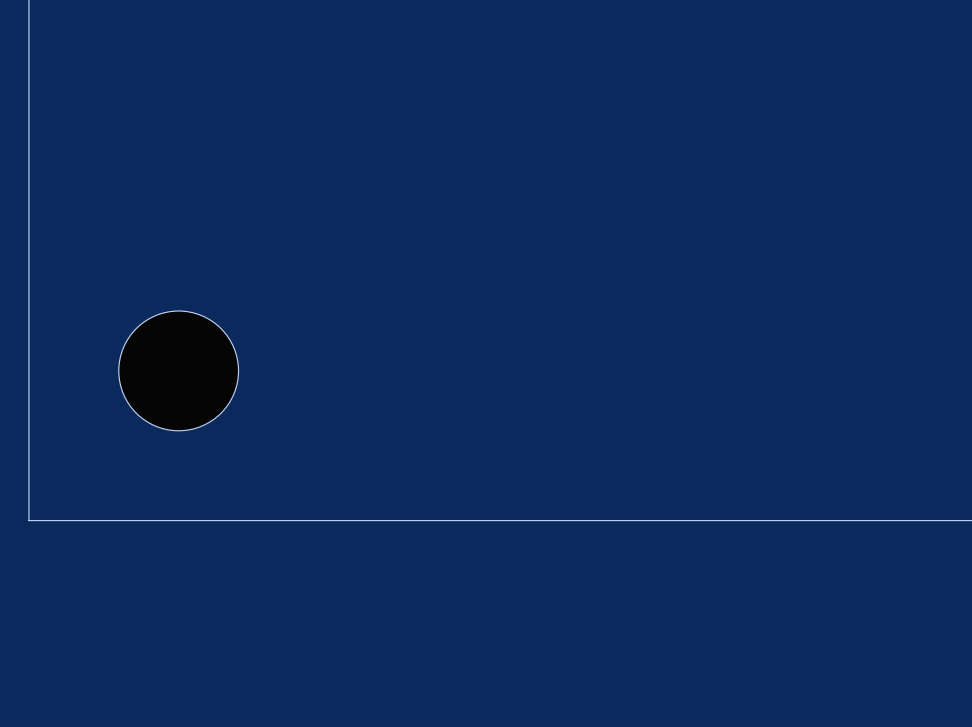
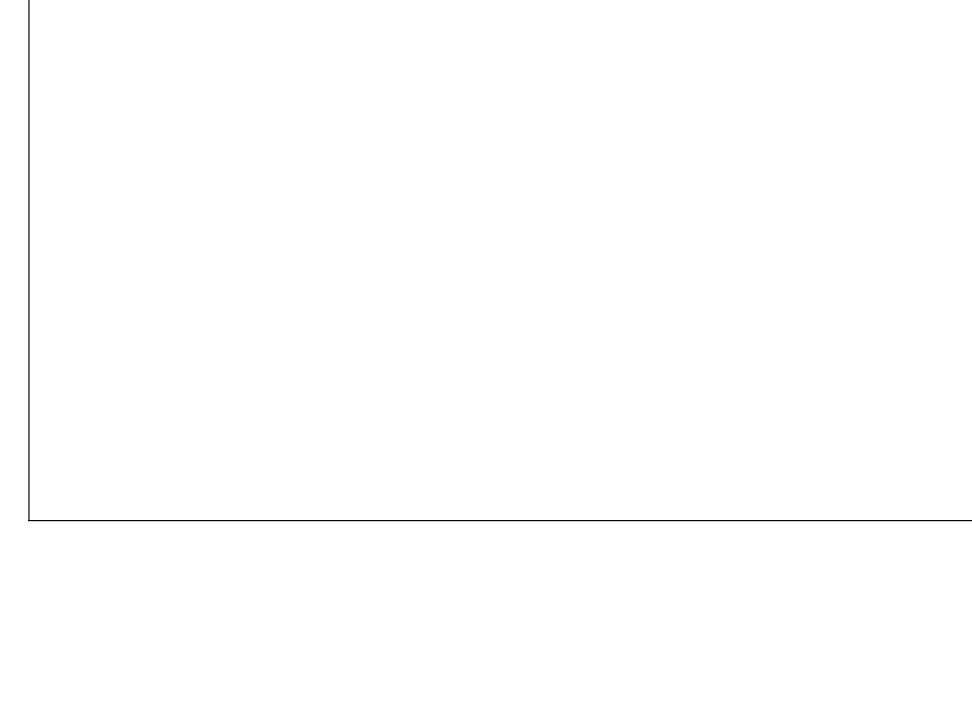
hole: (178, 370) -> none

